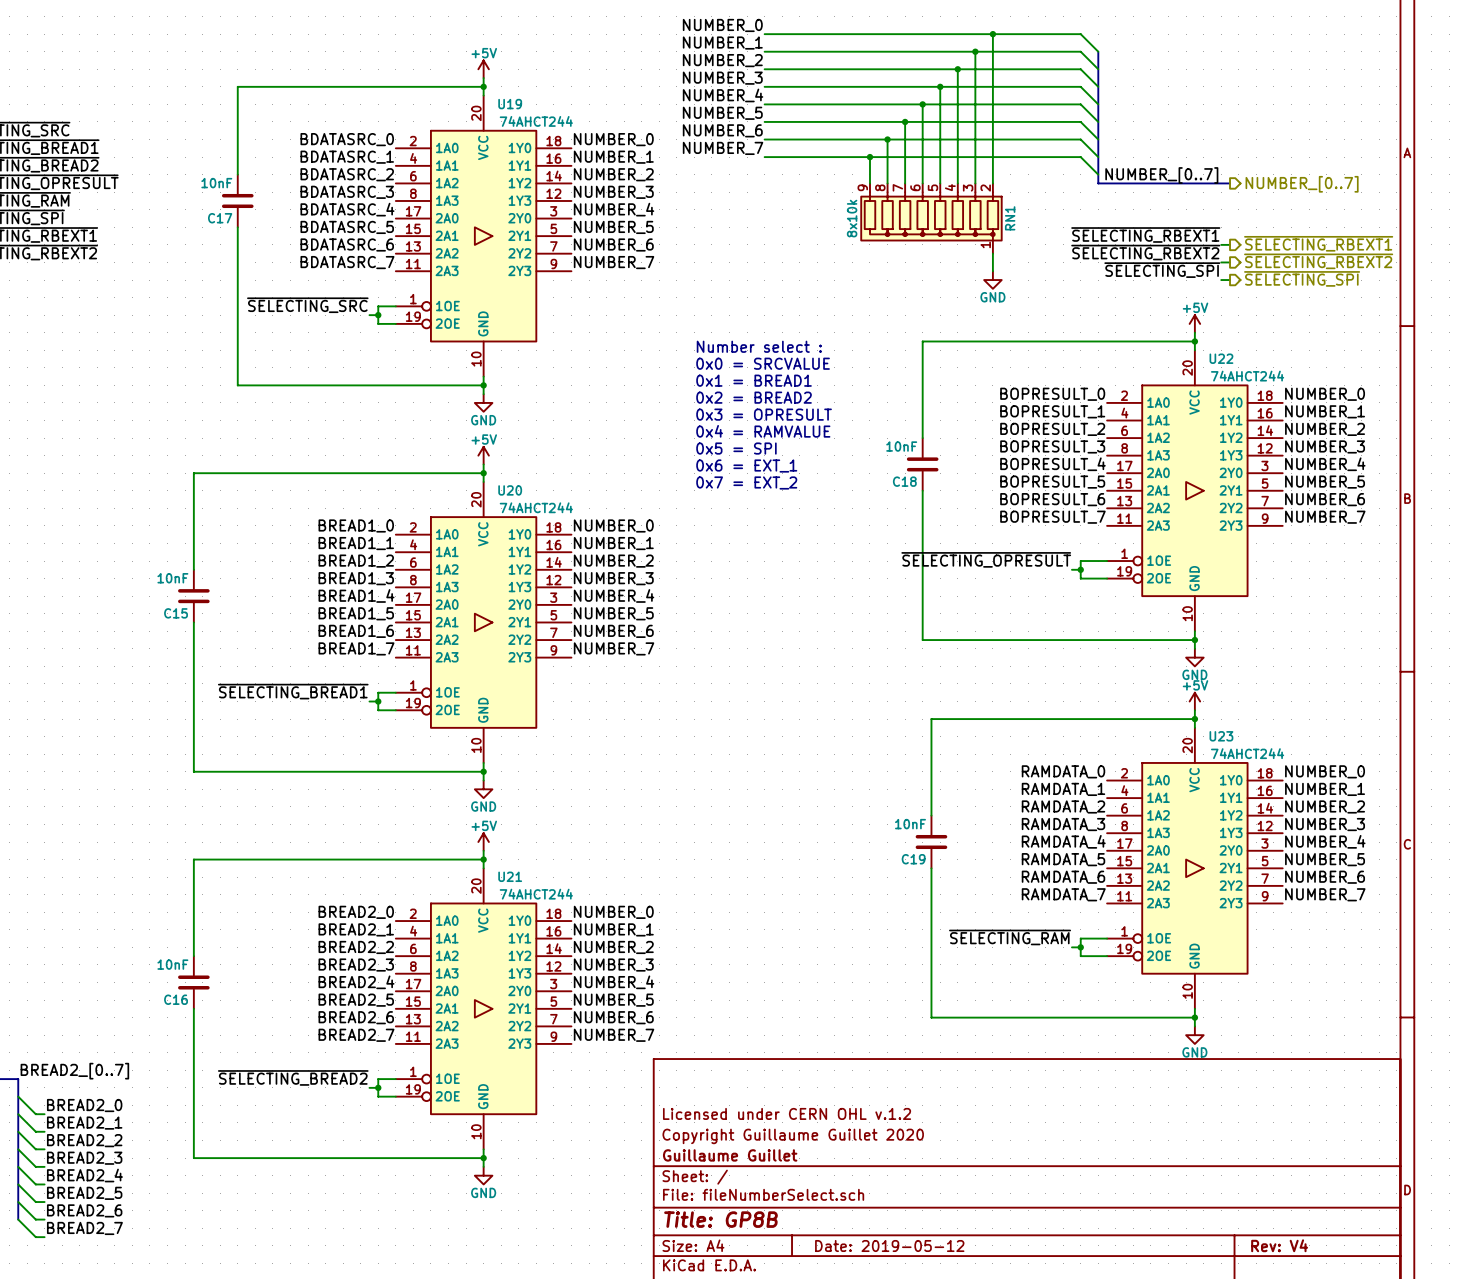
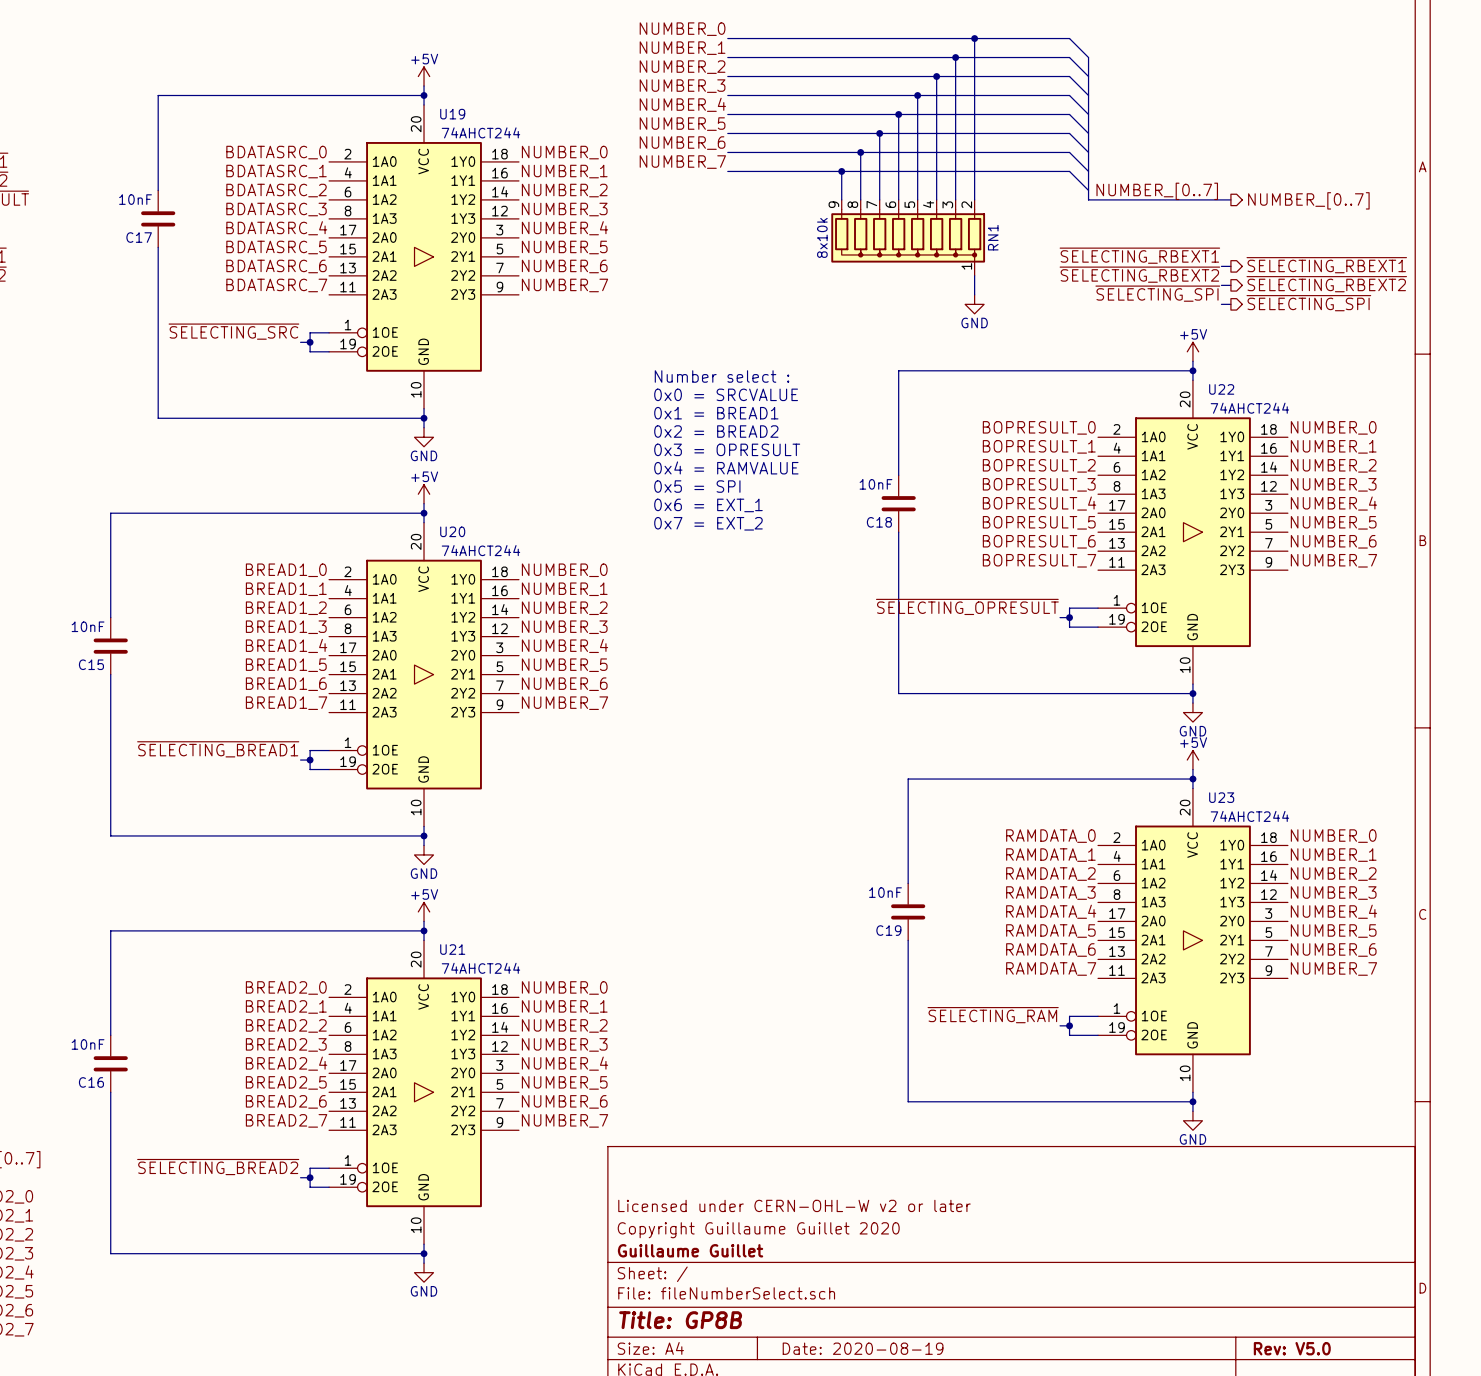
title block: Licensed under CERN OHL v.1.2 (787, 1113) -> Licensed under CERN-OHL-W v2 or later (794, 1205)
title block: Rev: V4 (1279, 1245) -> Rev: V5.0 (1292, 1348)
title block: Date: 2019-05-12 (889, 1246) -> Date: 2020-08-19 (863, 1348)

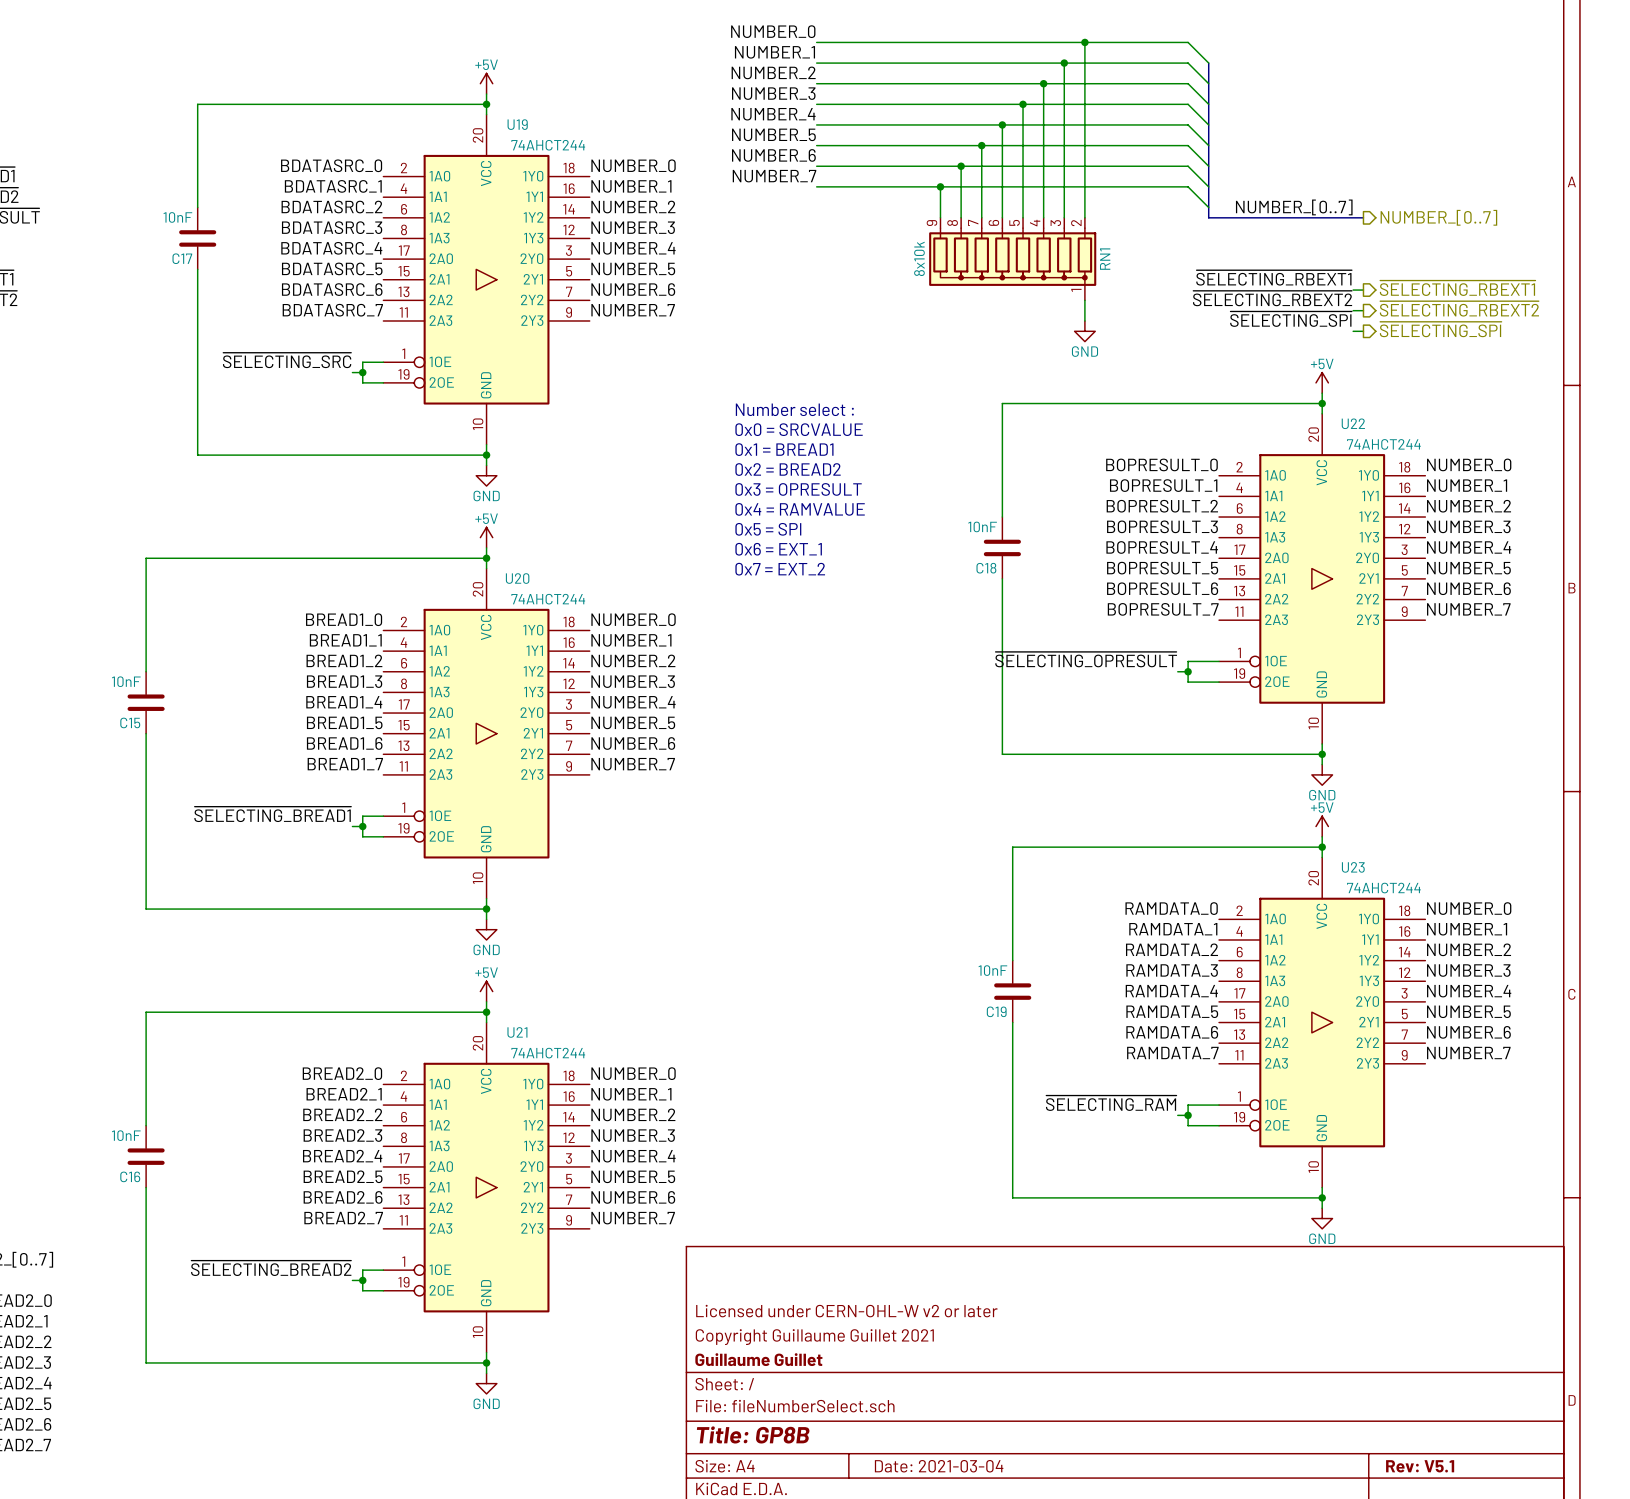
title block: Copyright Guillaume Guillet 2020 (758, 1230) -> Copyright Guillaume Guillet 2021 (814, 1337)
title block: Date: 2020-08-19 (863, 1348) -> Date: 2021-03-04 (939, 1466)
title block: Rev: V5.0 (1292, 1348) -> Rev: V5.1 (1420, 1466)

